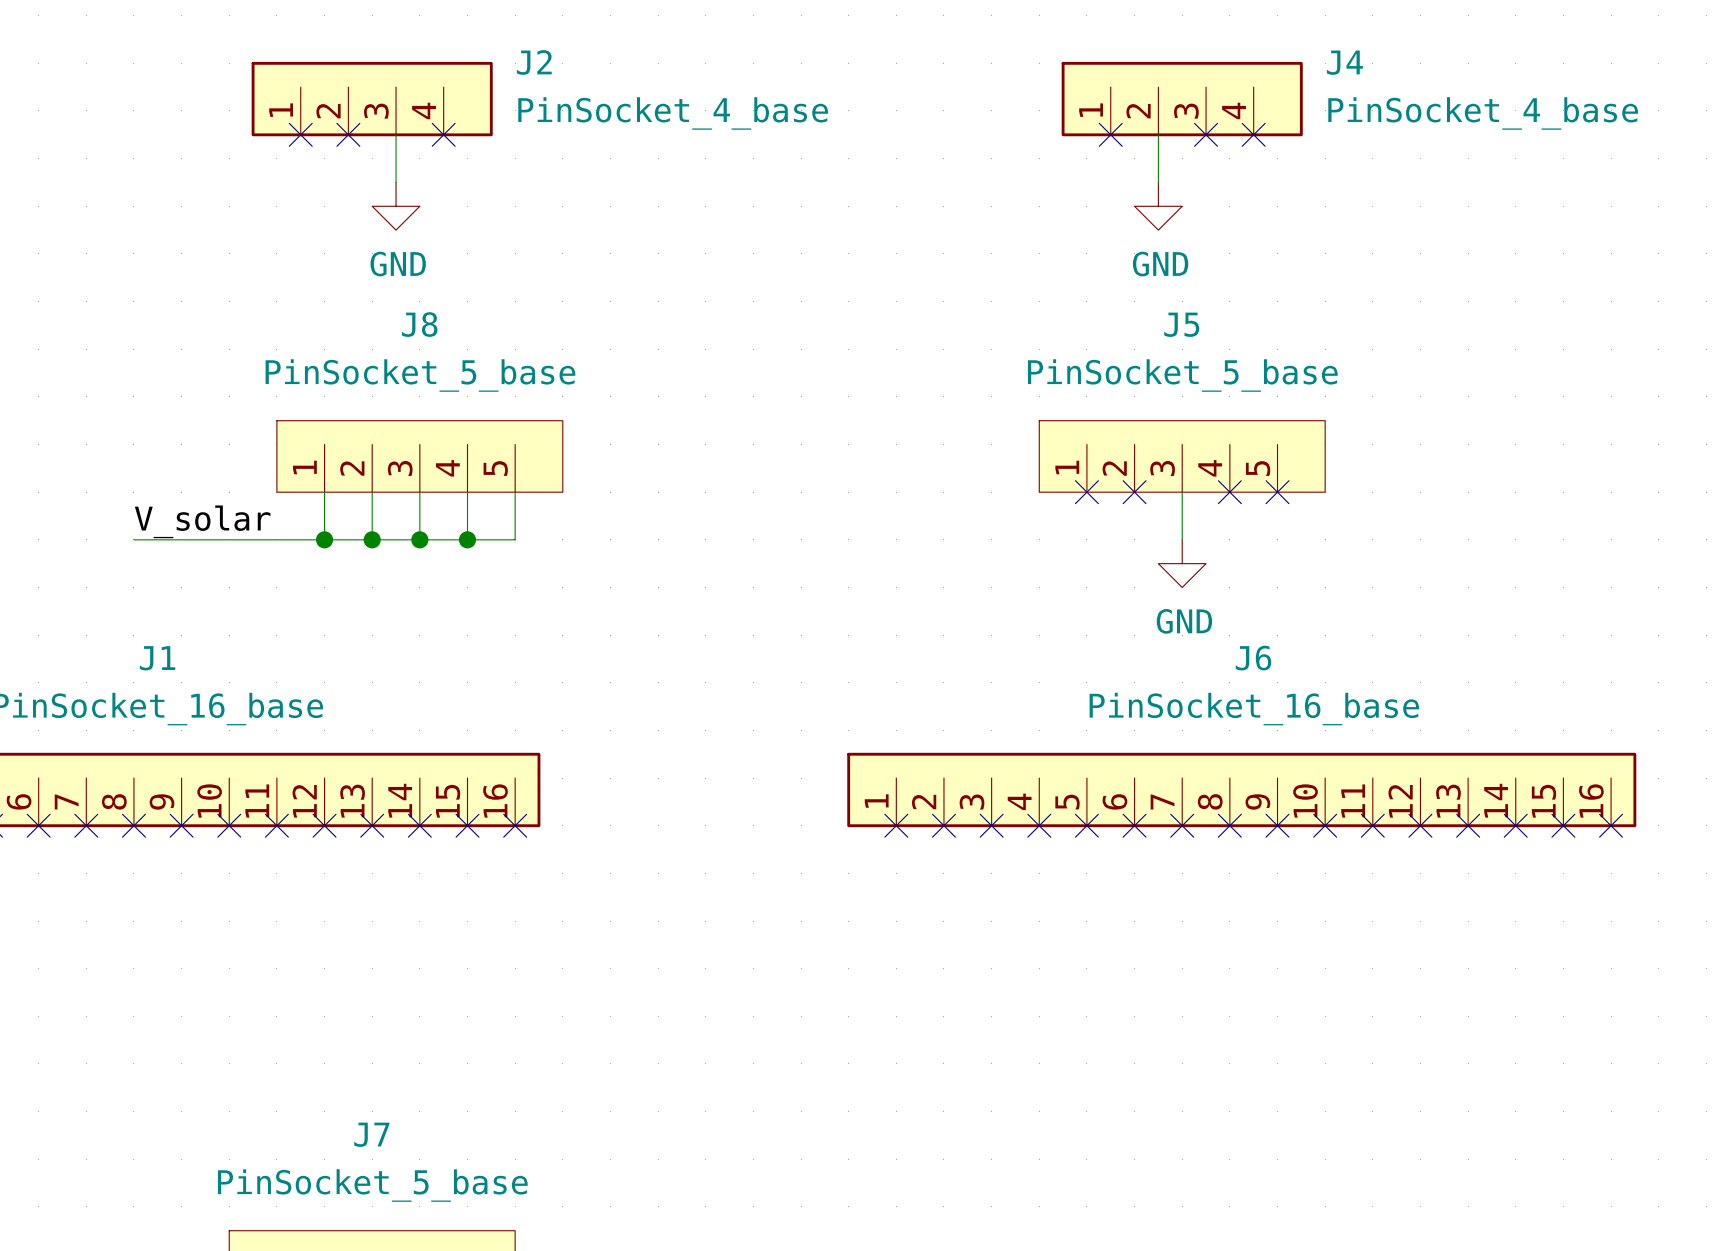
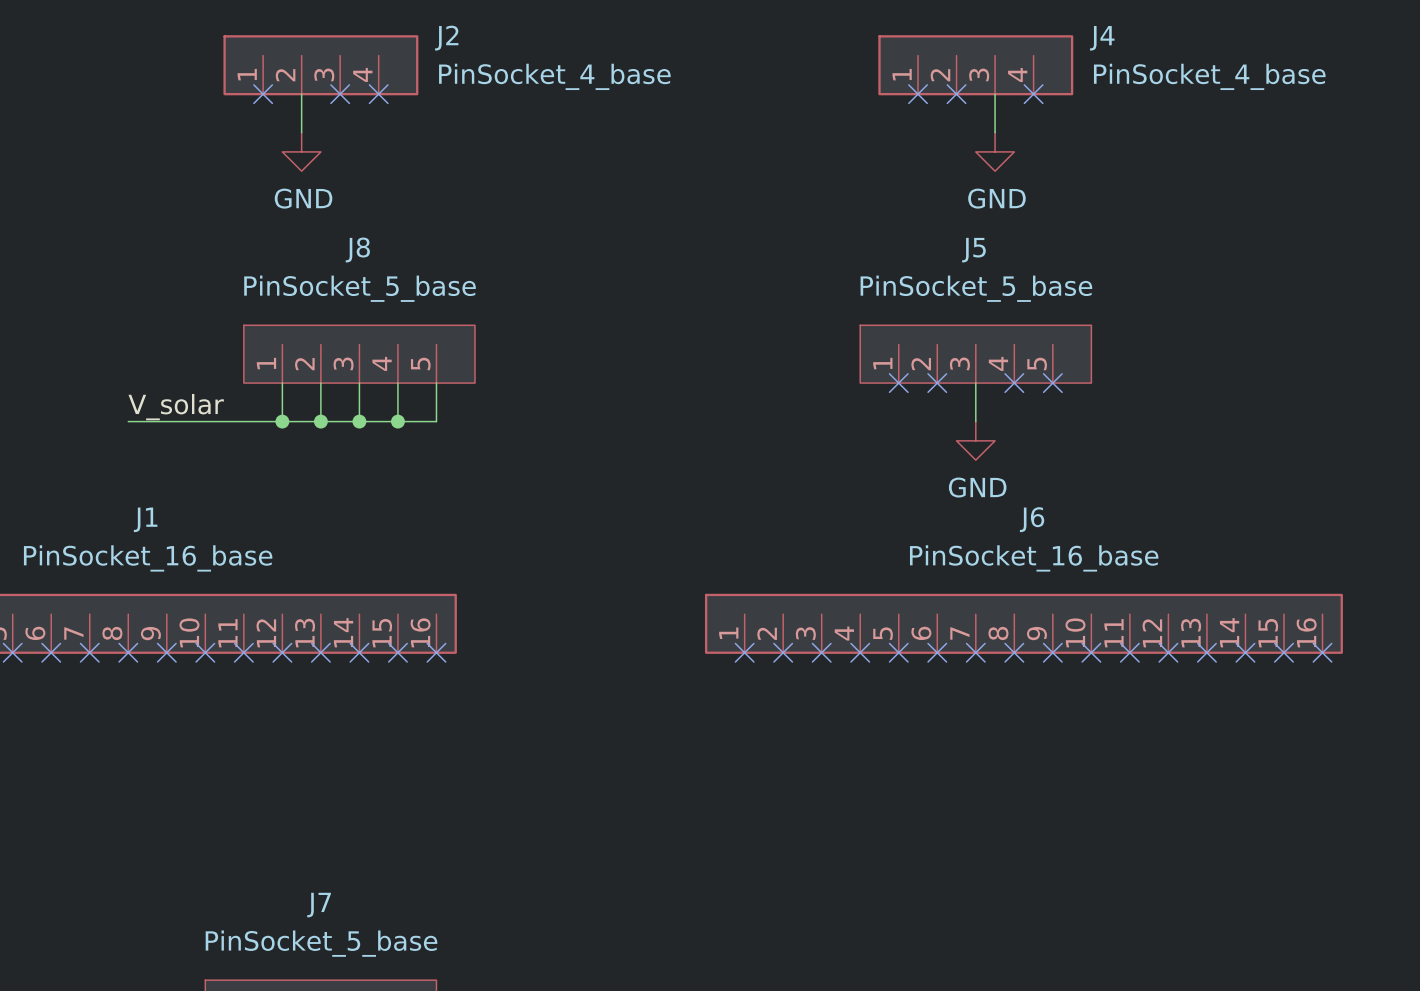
no-connect mark position: (348, 134) -> (340, 94)
wire: (396, 134) (396, 182) -> (301, 94) (301, 132)
wire: (1158, 134) (1158, 182) -> (995, 94) (995, 132)
no-connect mark position: (1206, 134) -> (956, 94)
power symbol position: GND (396, 206) -> GND (301, 151)
power symbol position: GND (1158, 206) -> GND (995, 151)

